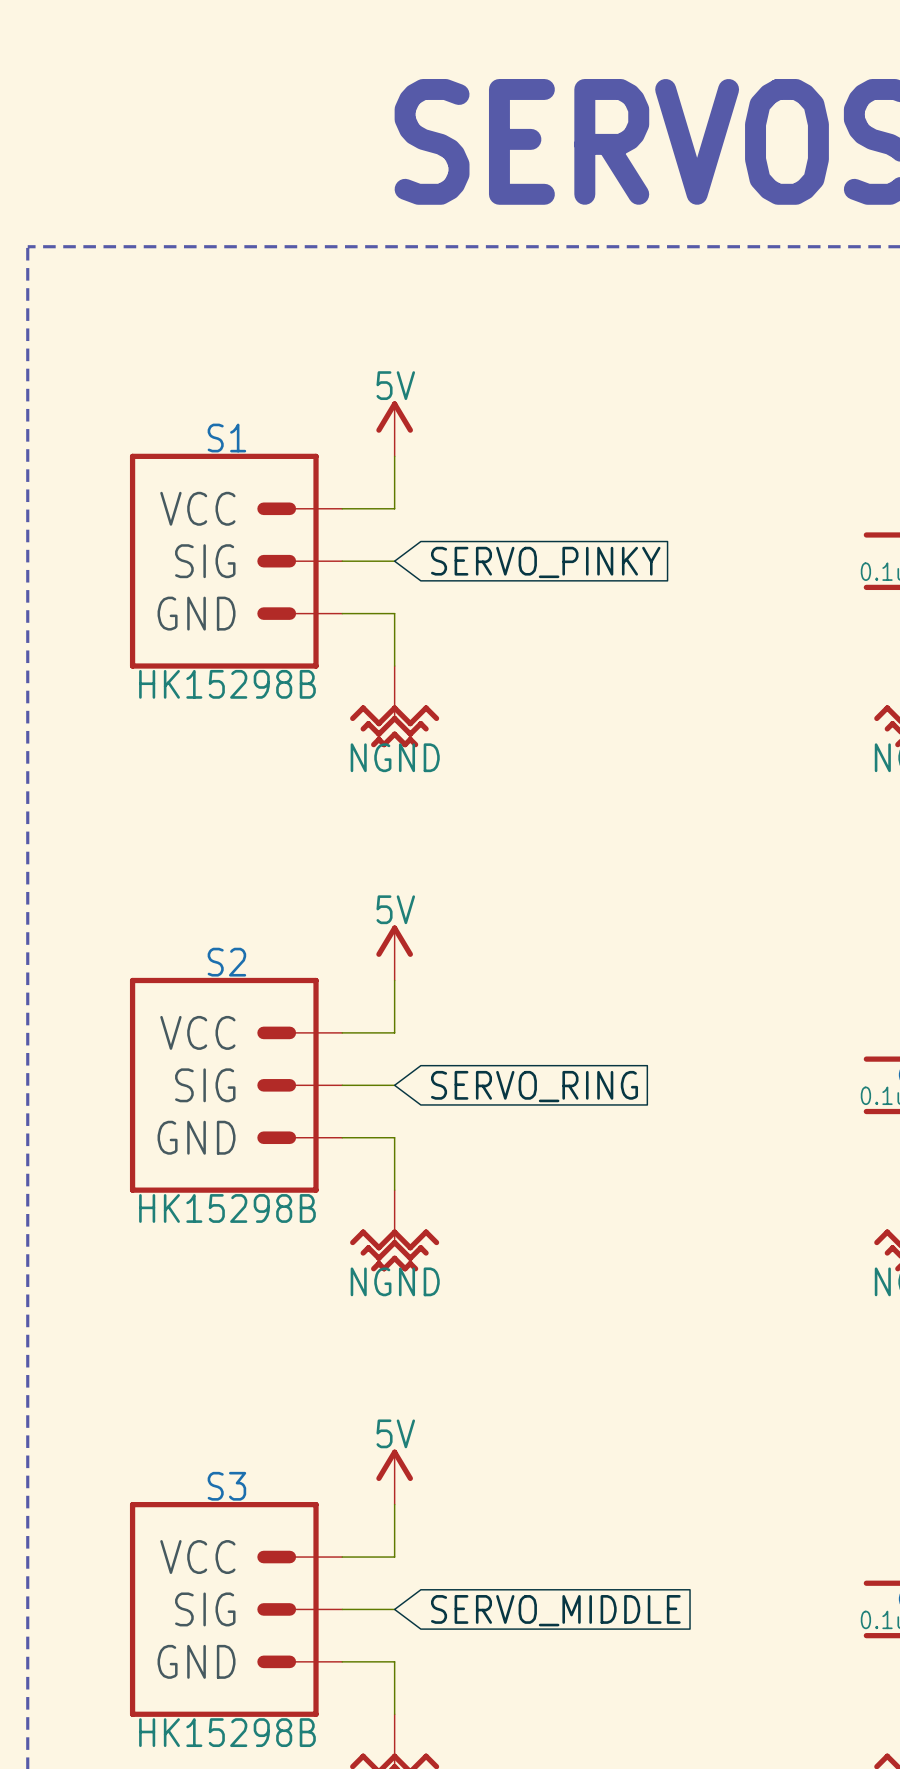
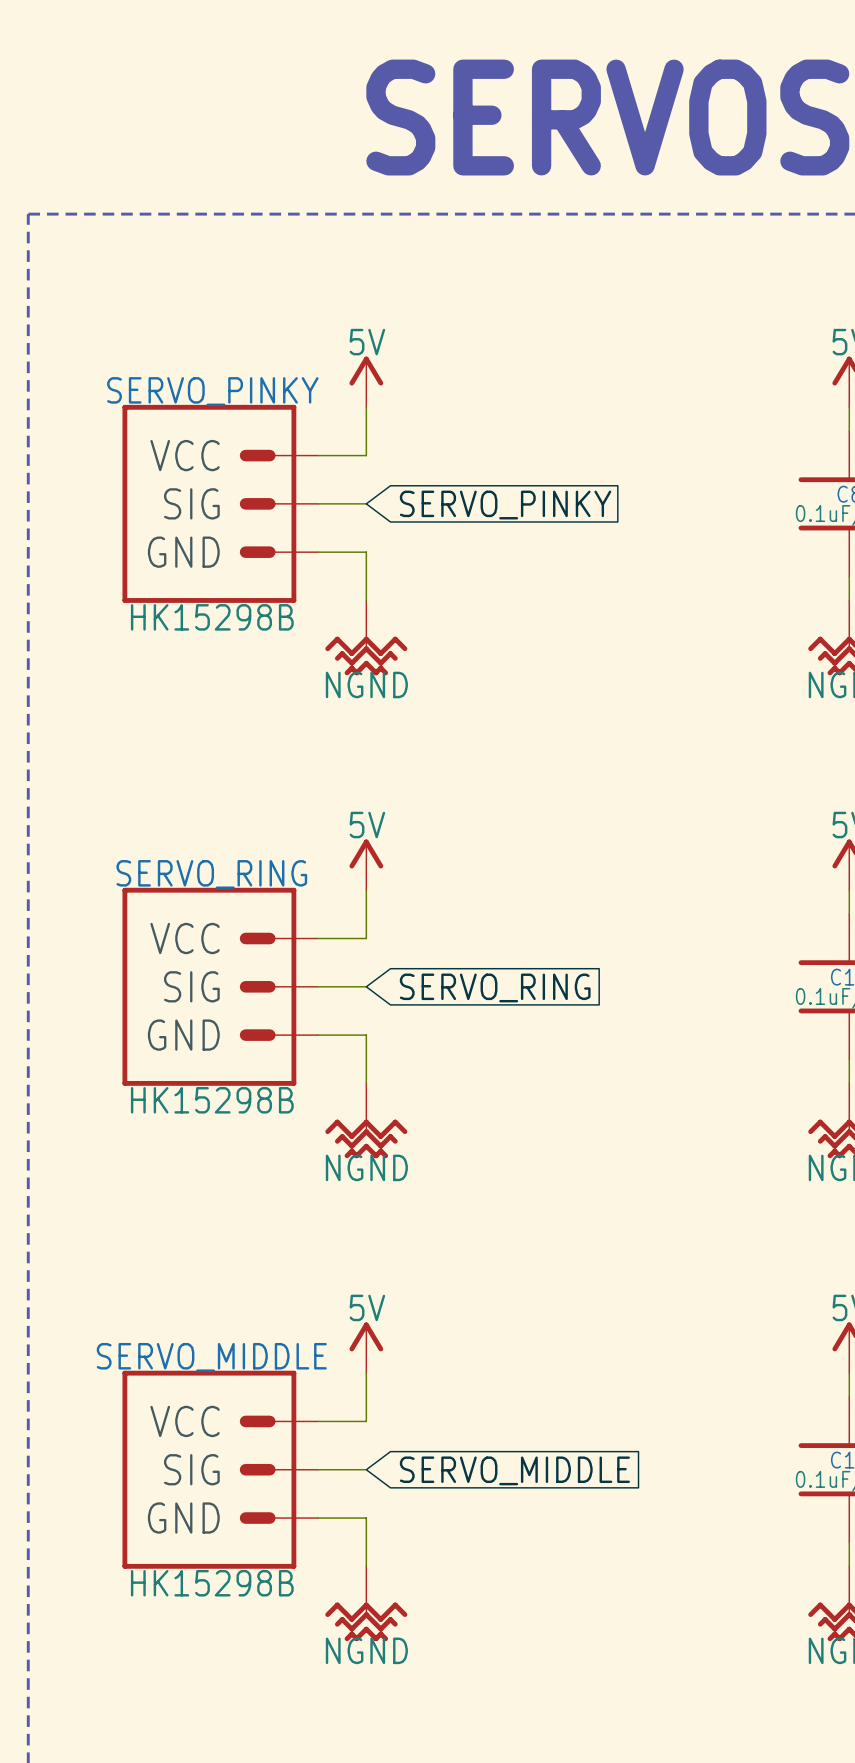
S1 name: S1 (226, 438) -> SERVO_PINKY (212, 391)
S2 name: S2 (226, 962) -> SERVO_RING (211, 874)
S3 name: S3 (226, 1486) -> SERVO_MIDDLE (211, 1357)

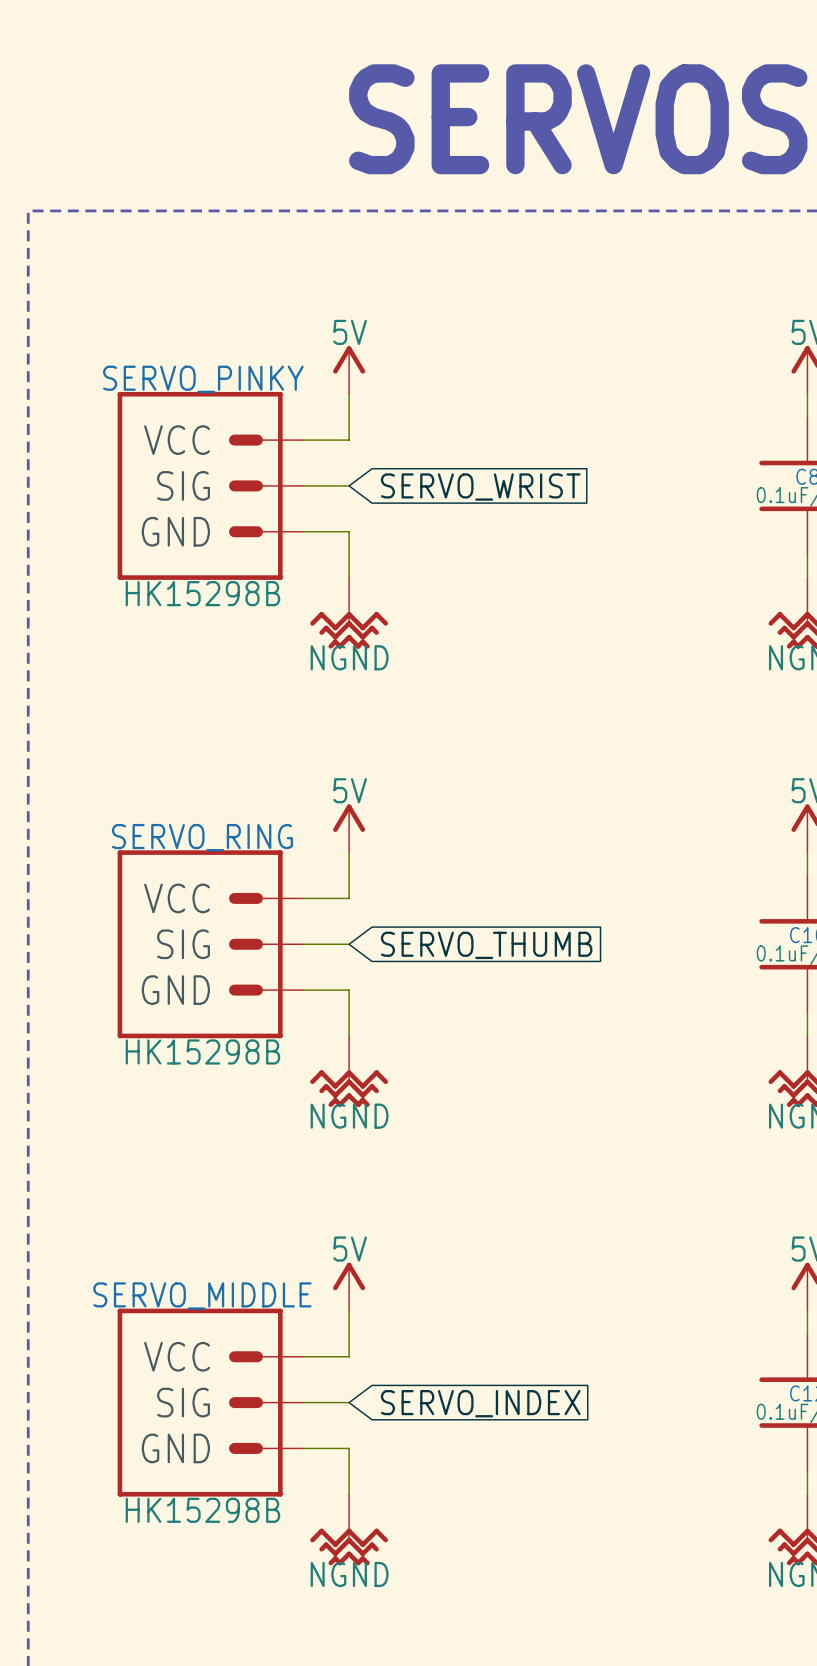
global label: SERVO_PINKY (505, 505) -> SERVO_WRIST (480, 487)
global label: SERVO_RING (495, 987) -> SERVO_THUMB (486, 945)
global label: SERVO_MIDDLE (514, 1470) -> SERVO_INDEX (480, 1403)

